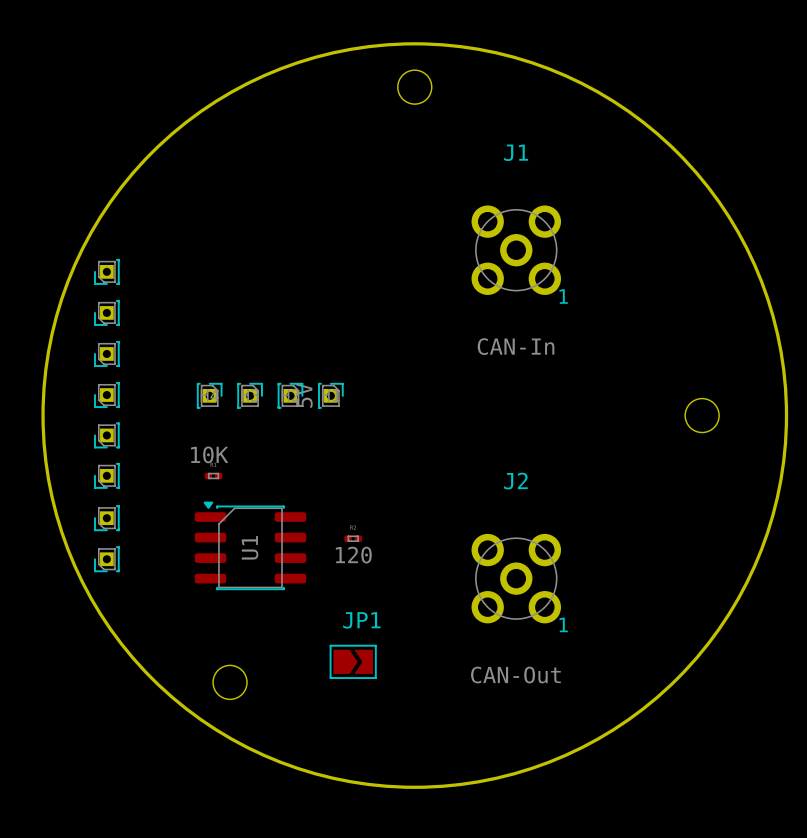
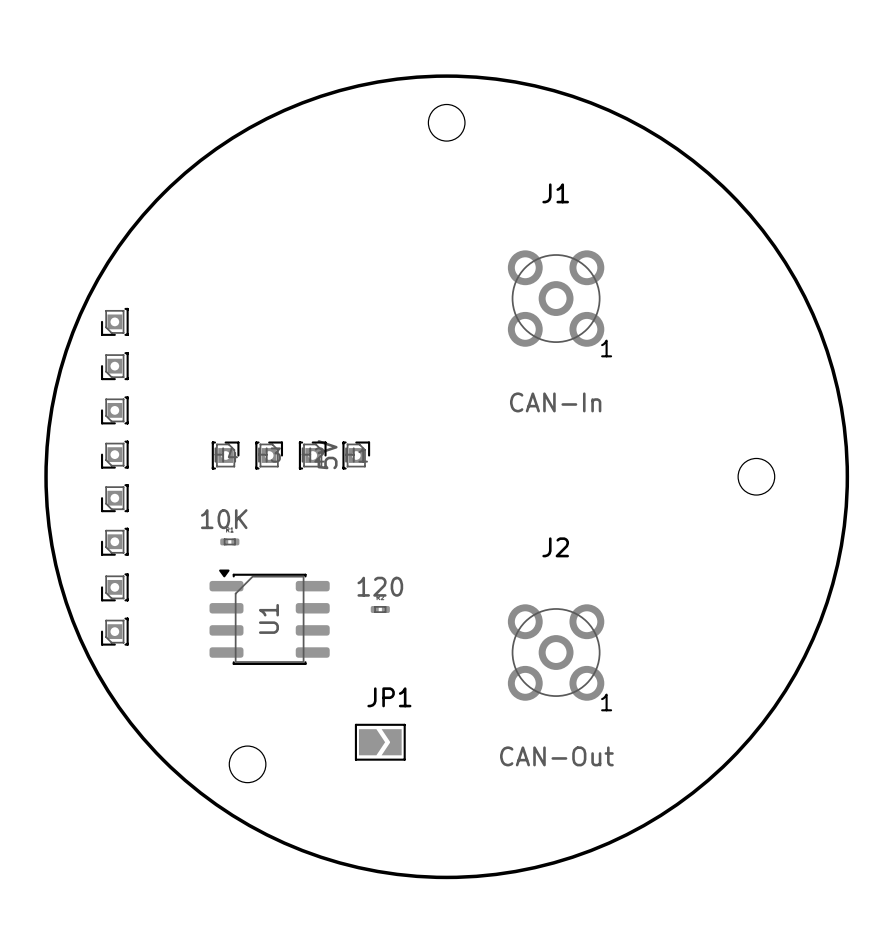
part value position: 120 (353, 555) -> 120 (380, 586)

